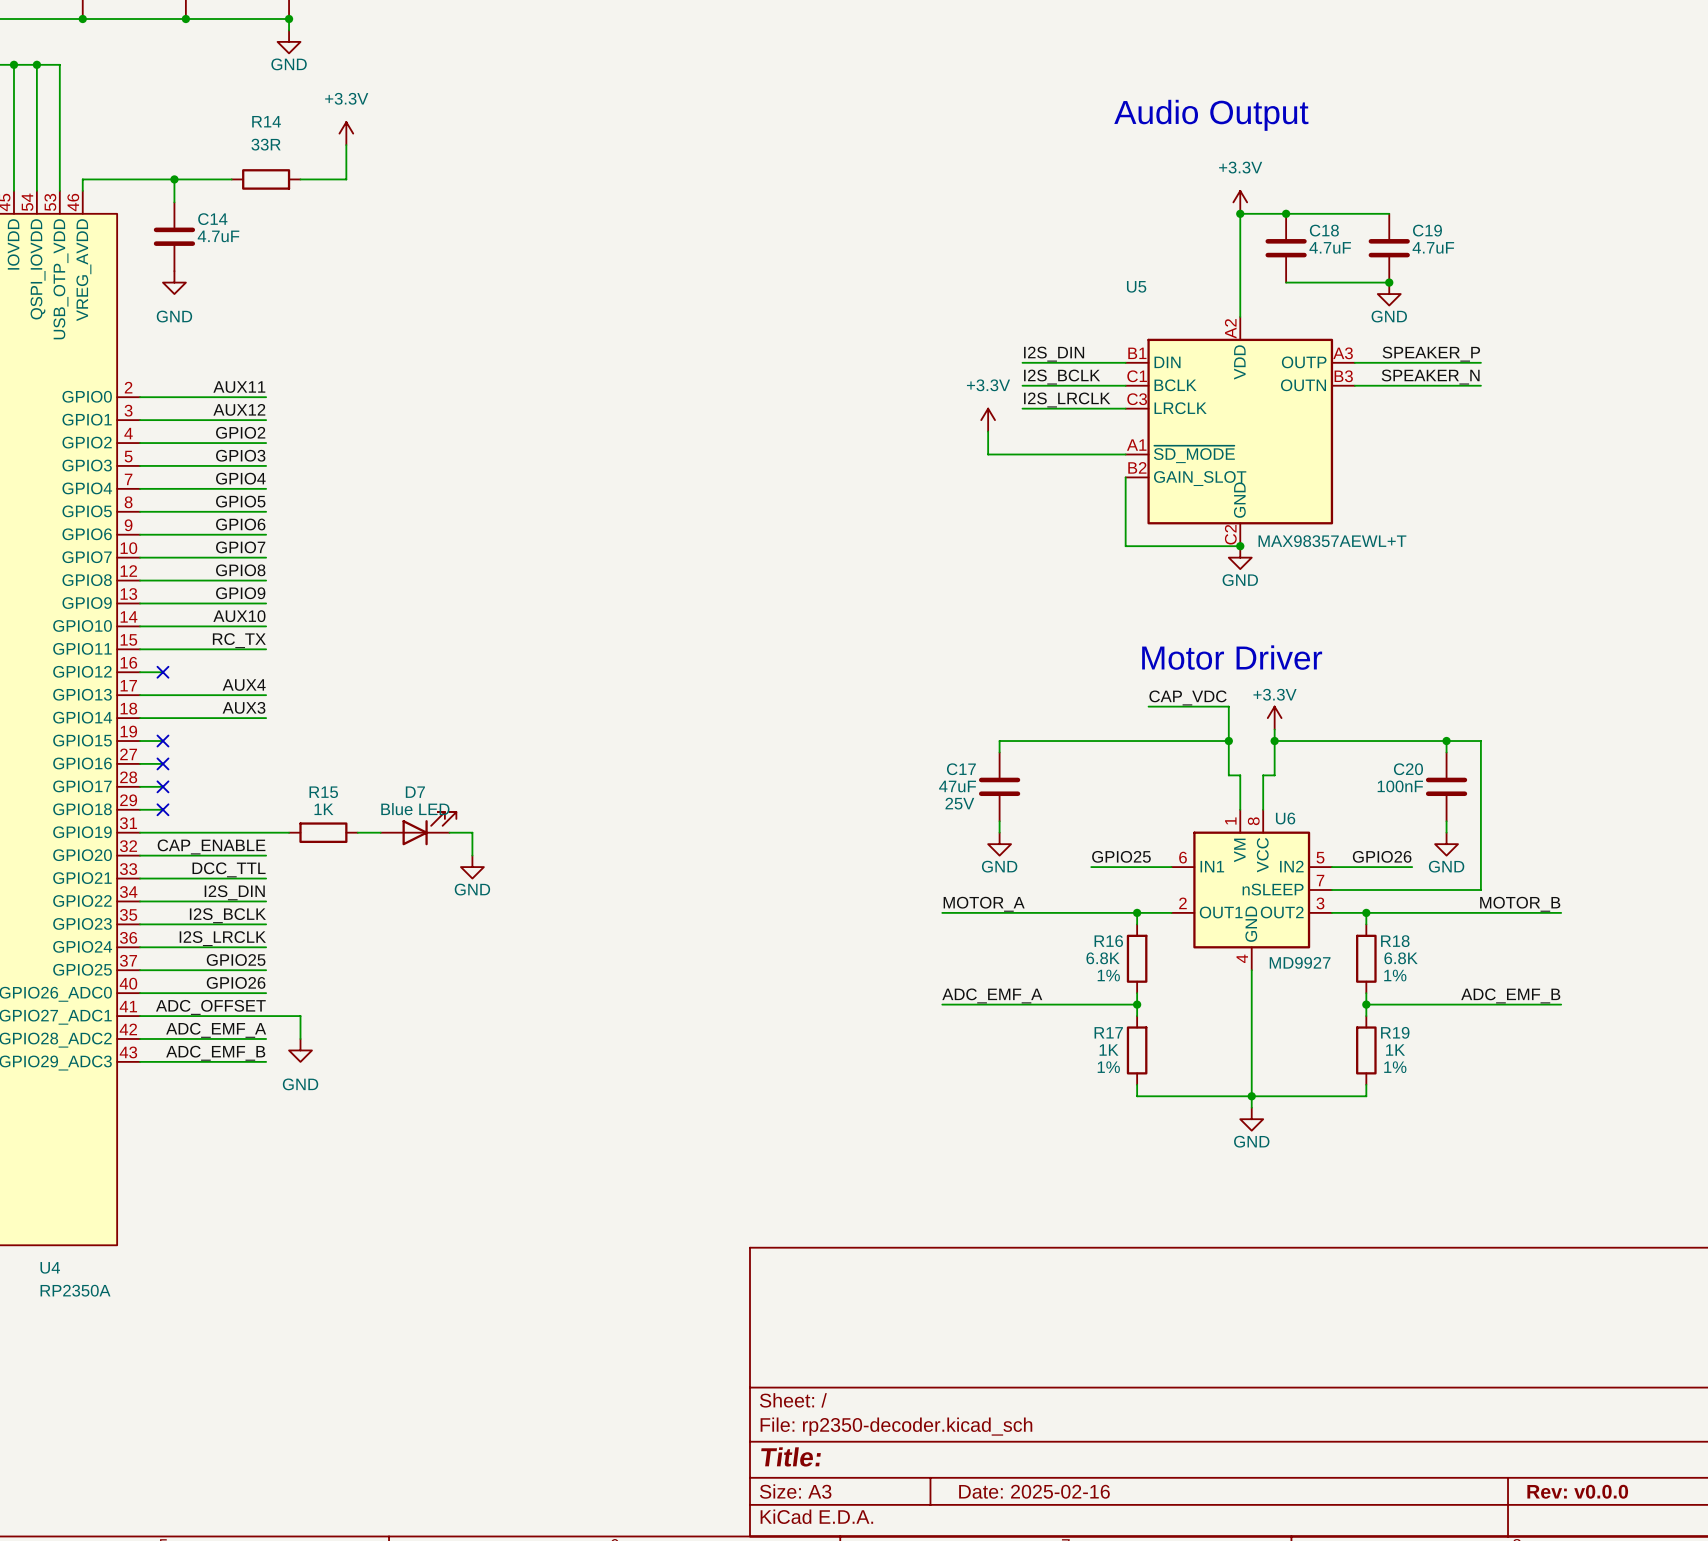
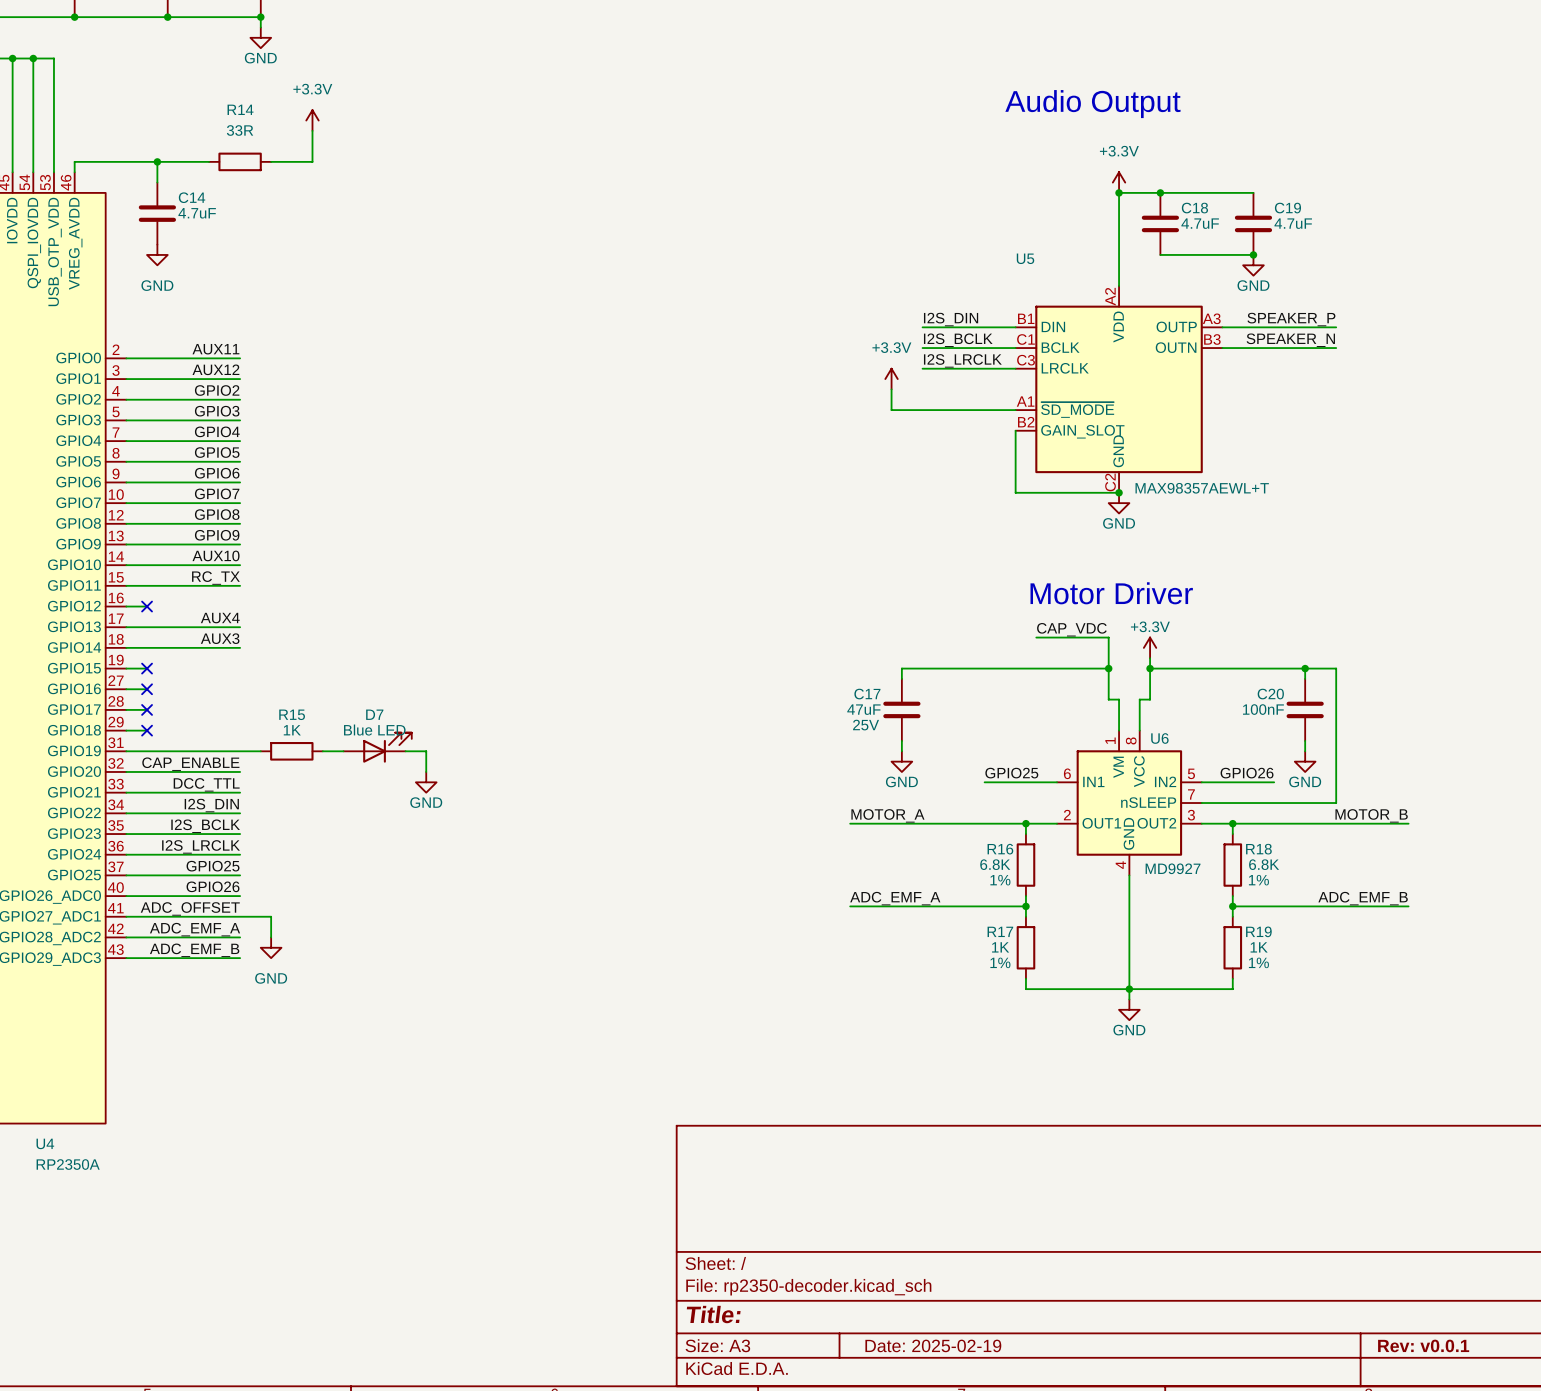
title block: Date: 2025-02-16 (1034, 1491) -> Date: 2025-02-19 (933, 1345)
title block: Rev: v0.0.0 (1577, 1491) -> Rev: v0.0.1 (1423, 1345)

